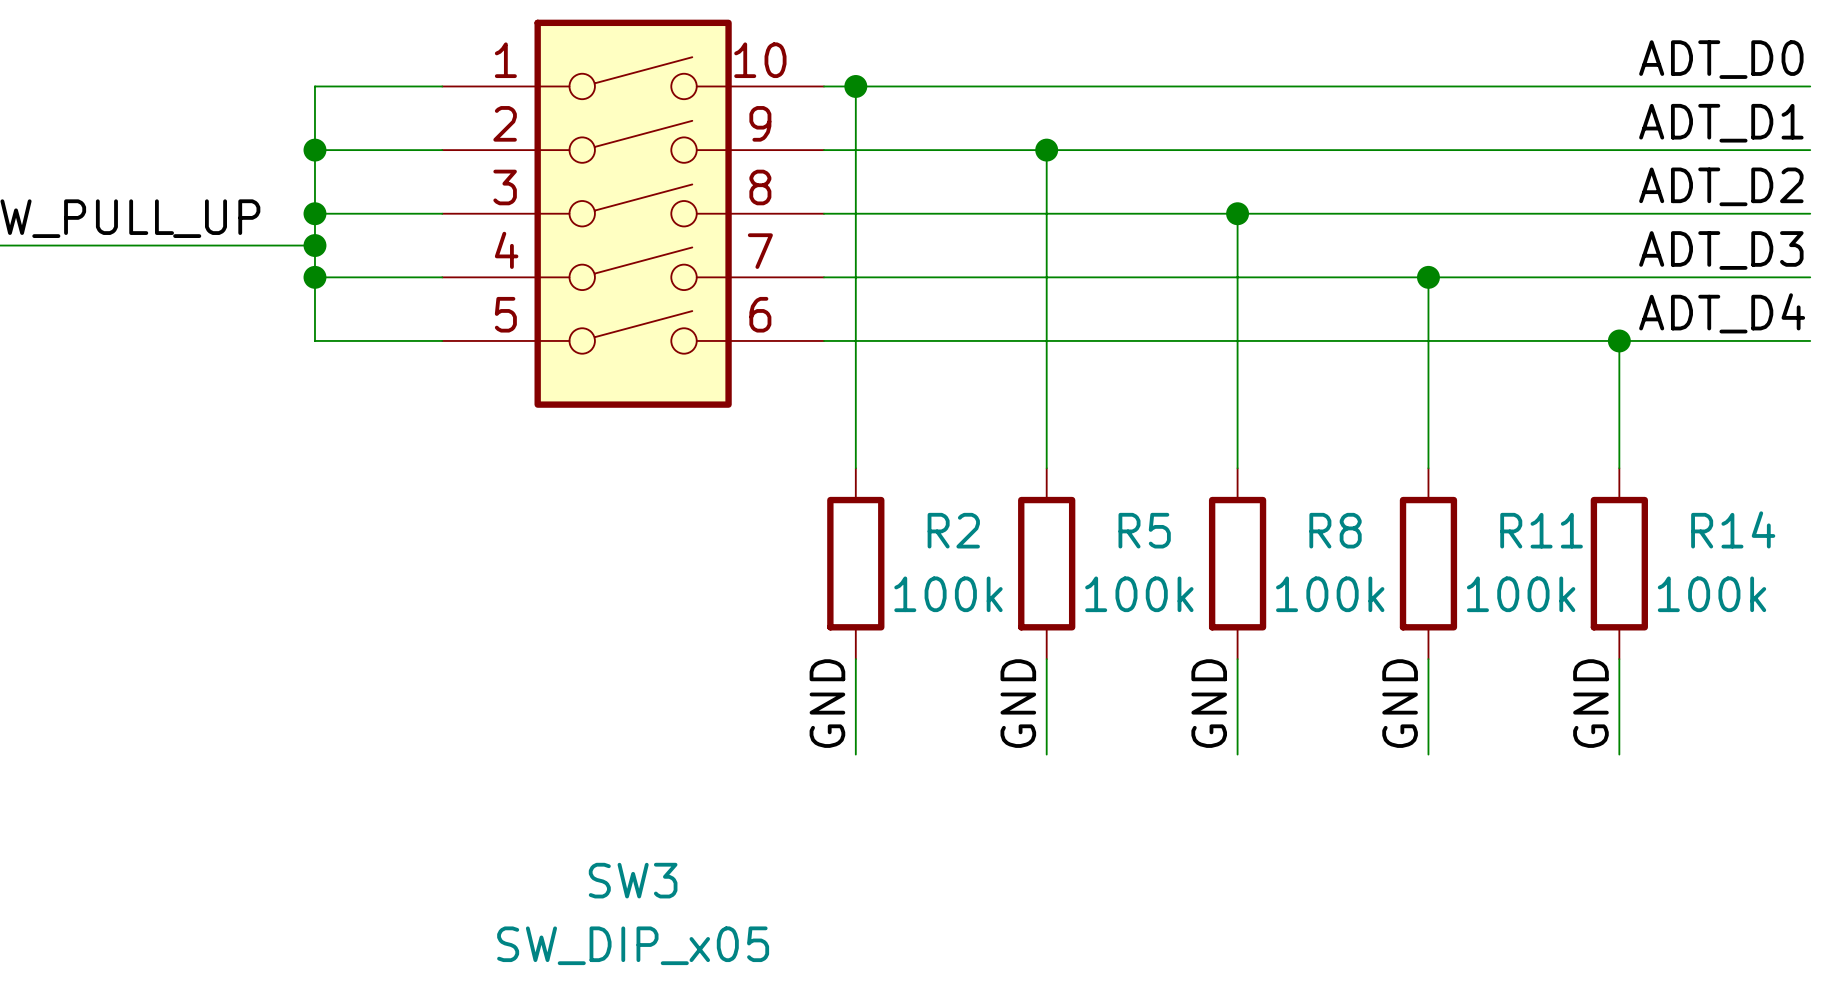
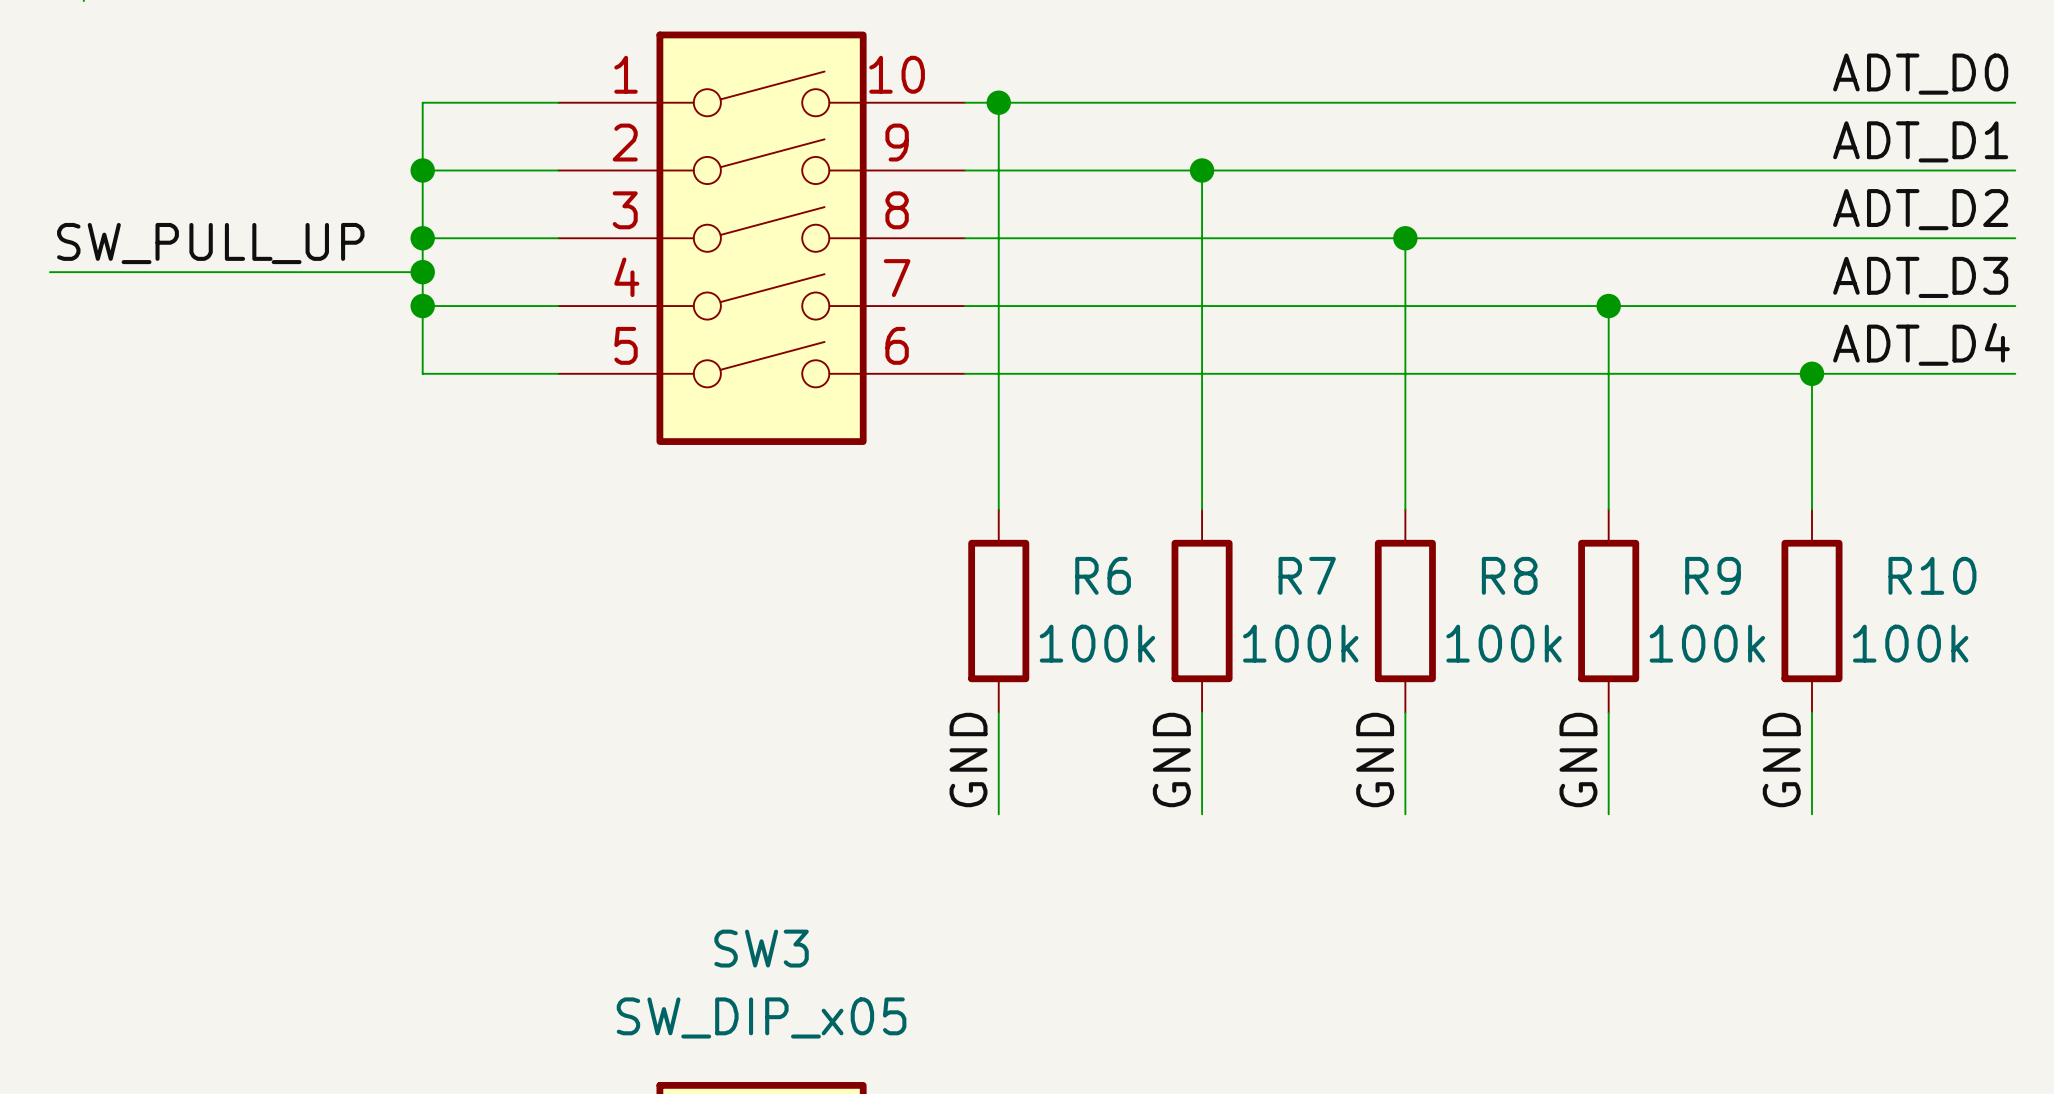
R14 name: R14 (1733, 529) -> R10 (1932, 575)
R2 name: R2 (953, 530) -> R6 (1103, 575)
R5 name: R5 (1144, 530) -> R7 (1307, 575)
R11 name: R11 (1541, 530) -> R9 (1713, 575)

